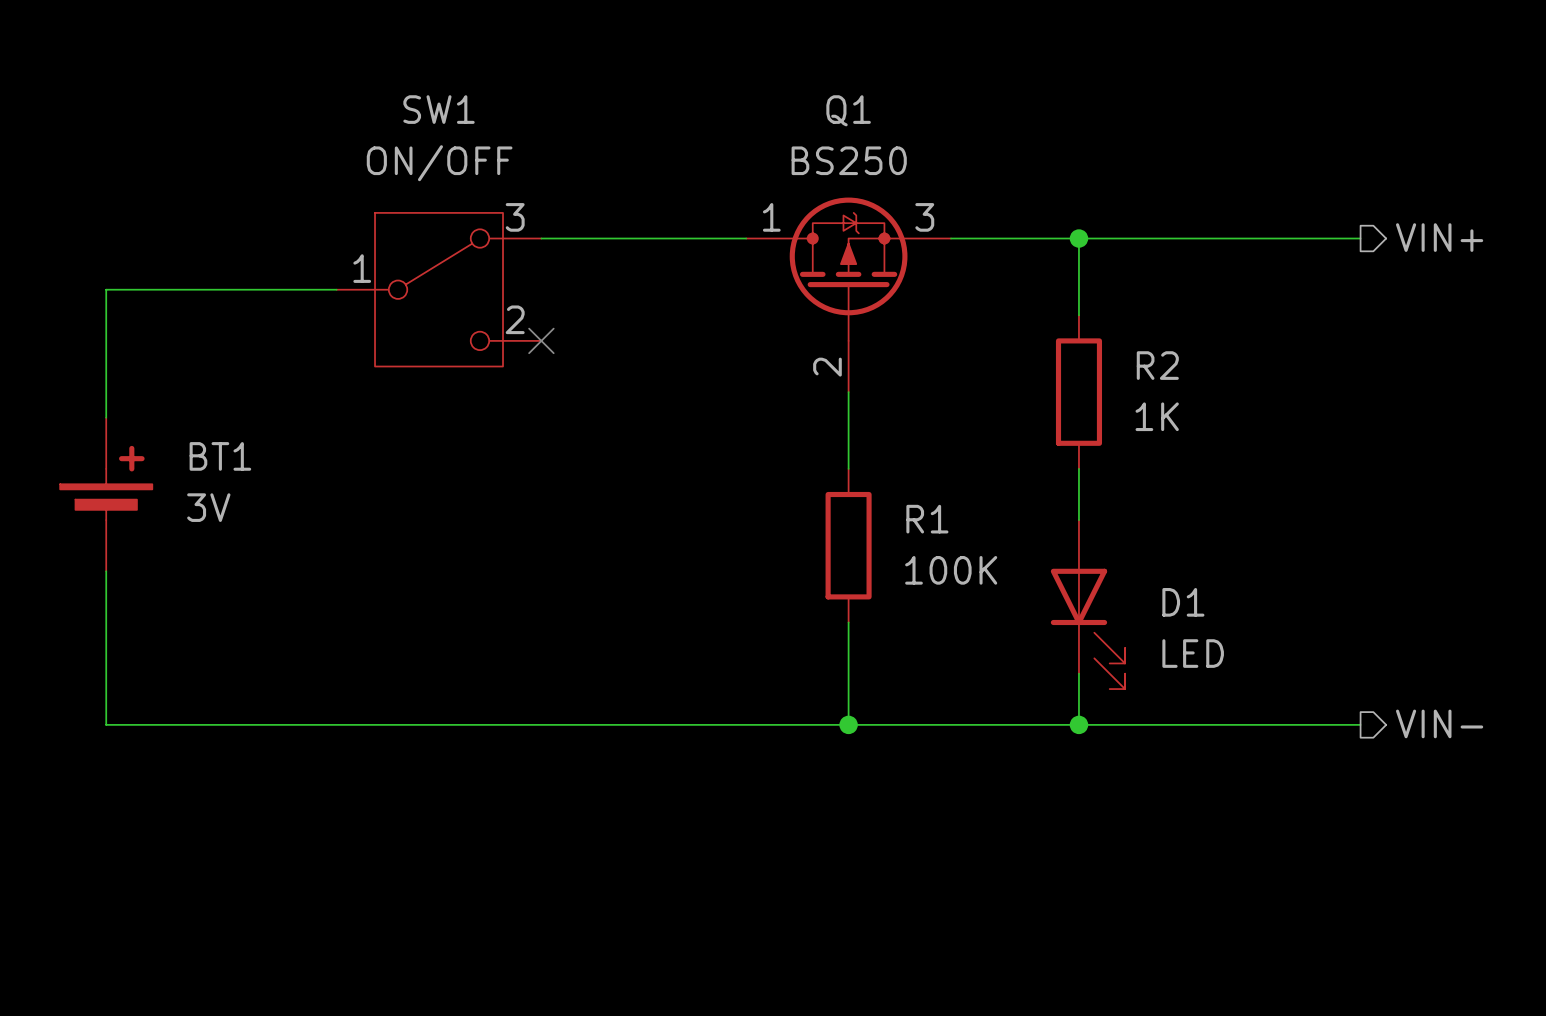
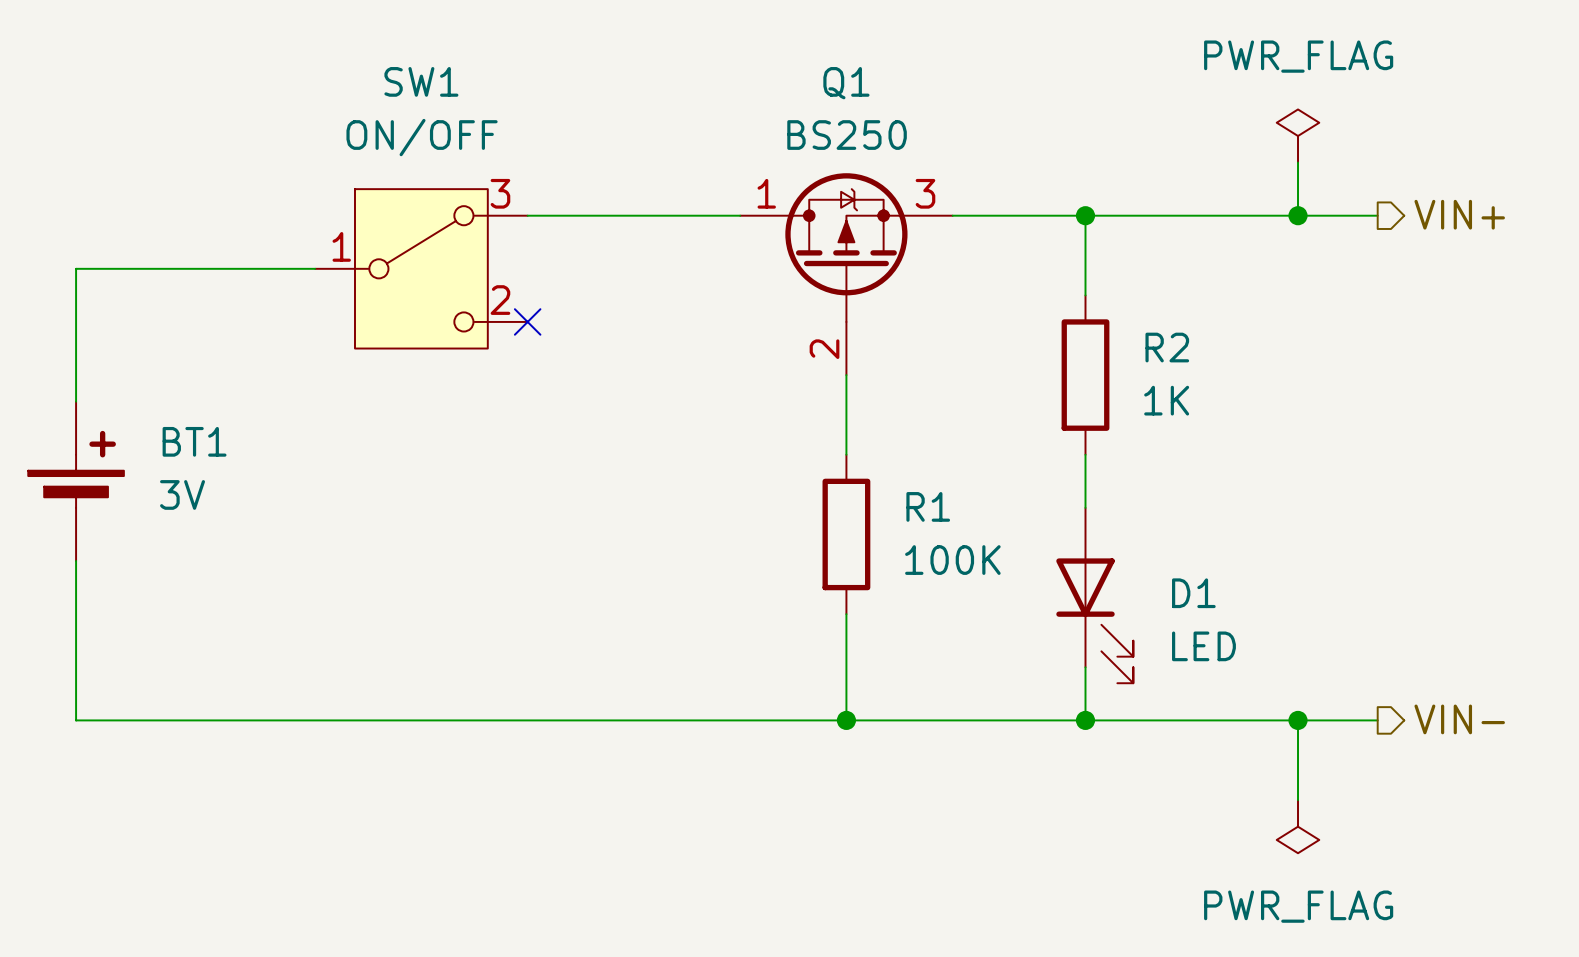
power symbol: none -> PWR_FLAG (1298, 136)
wire: none -> (1298, 162) (1298, 215)
junction: none -> (1298, 215)
wire: none -> (1298, 720) (1298, 800)
junction: none -> (1298, 720)
power symbol: none -> PWR_FLAG (1298, 826)

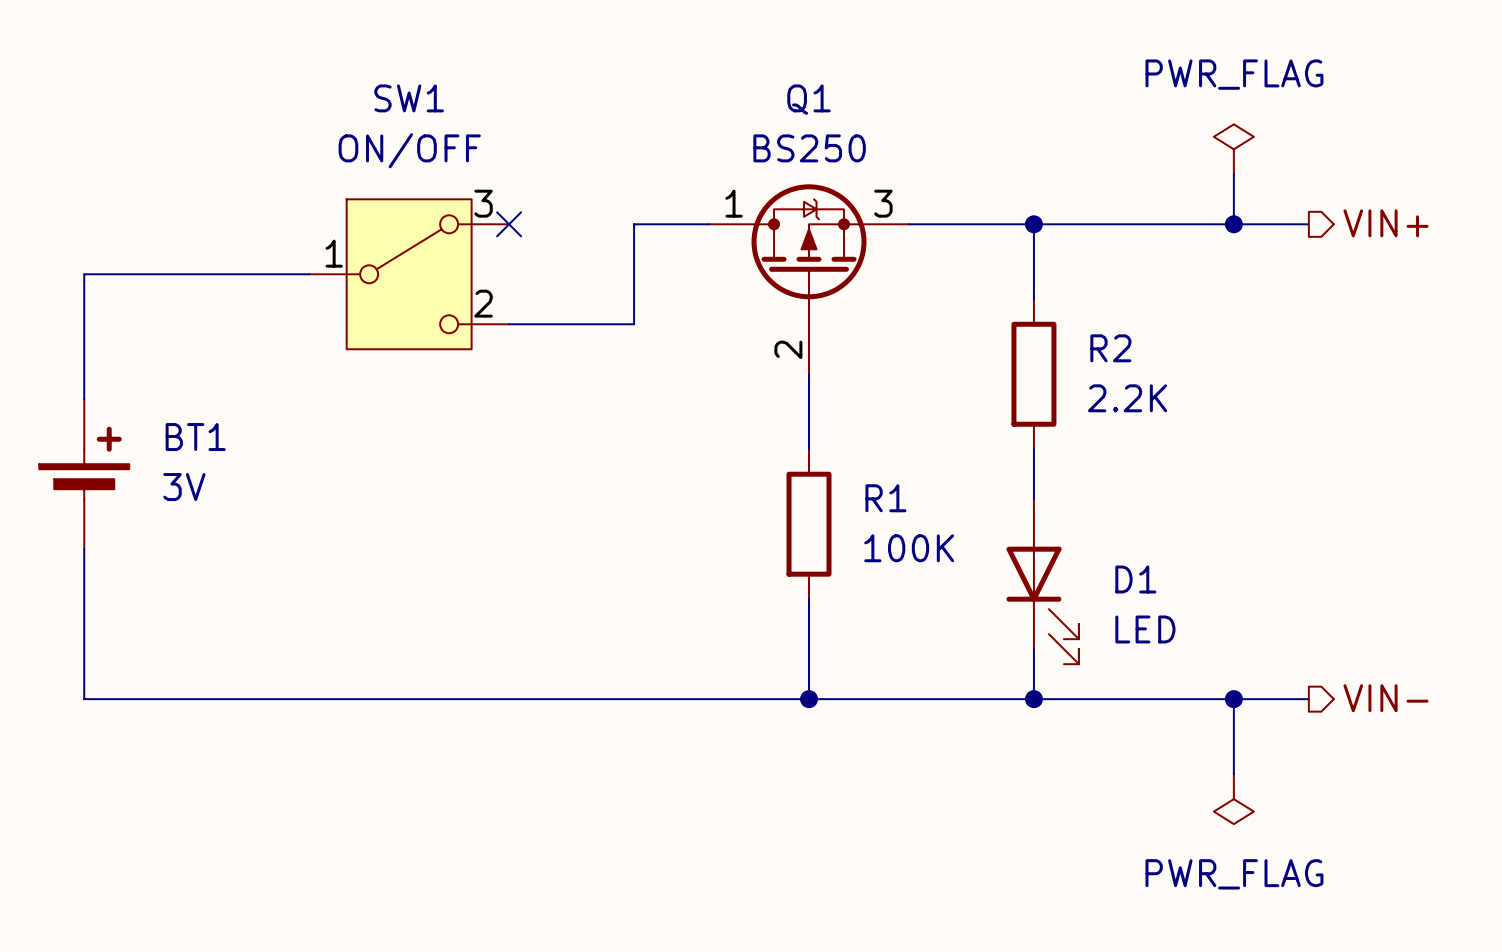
wire: (527, 215) (660, 215) -> (509, 324) (634, 324) (634, 224)
no-connect mark position: (527, 321) -> (509, 224)
R2 value: 1K (1166, 400) -> 2.2K (1127, 398)

